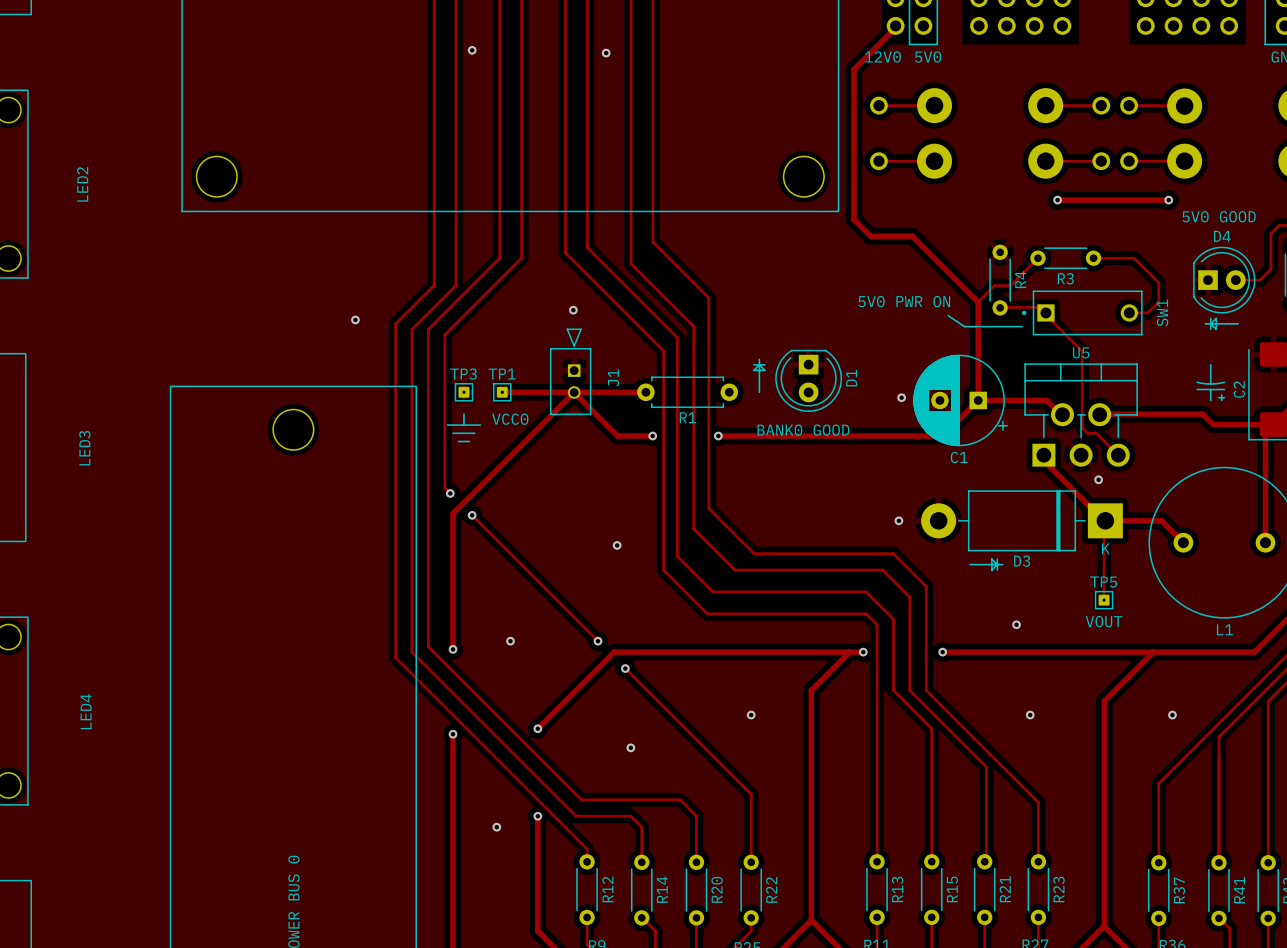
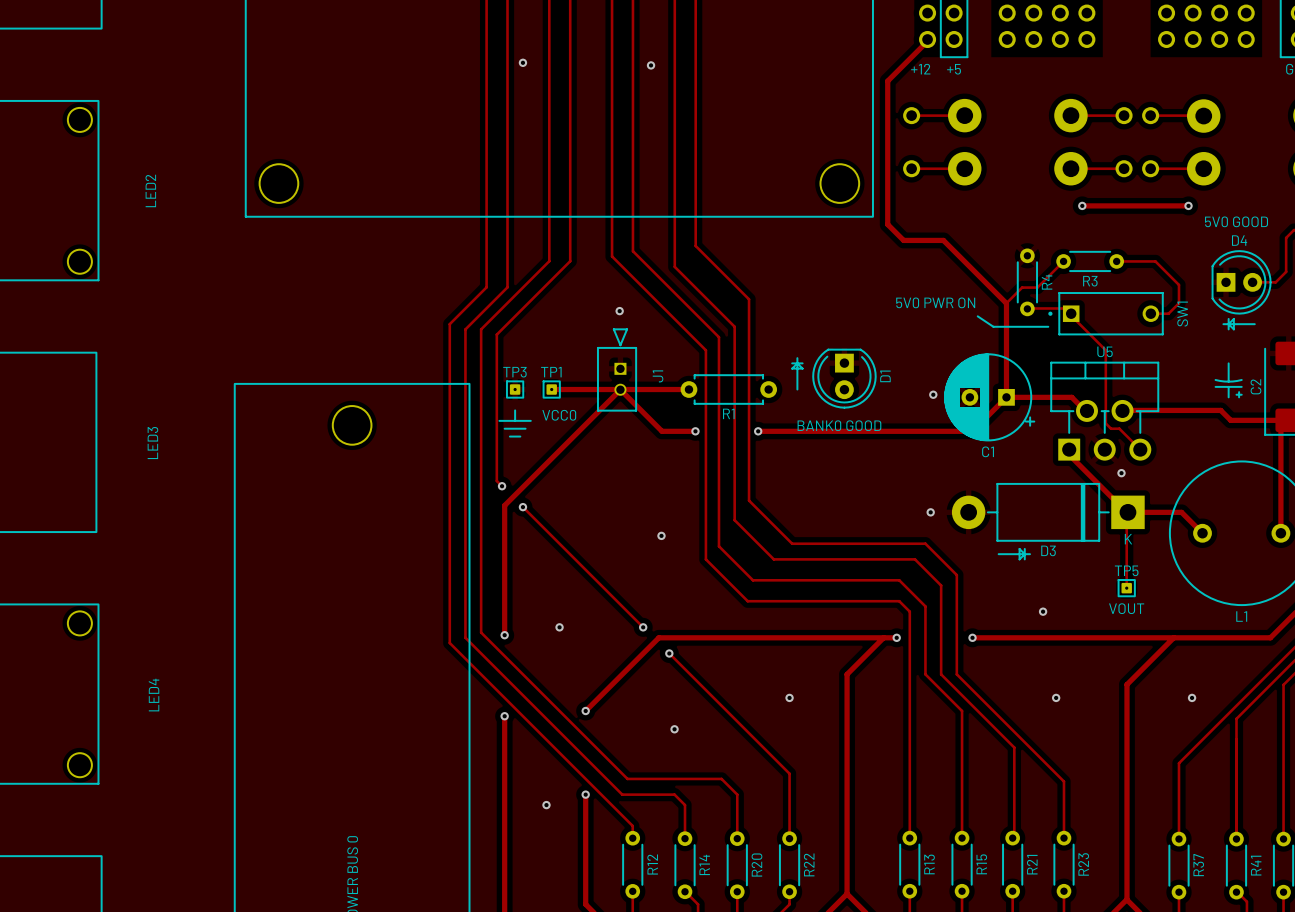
text: 12V0 (882, 57) -> +12 (920, 69)
text: 5V0 (928, 57) -> +5 (954, 69)
via: (355, 319) -> none

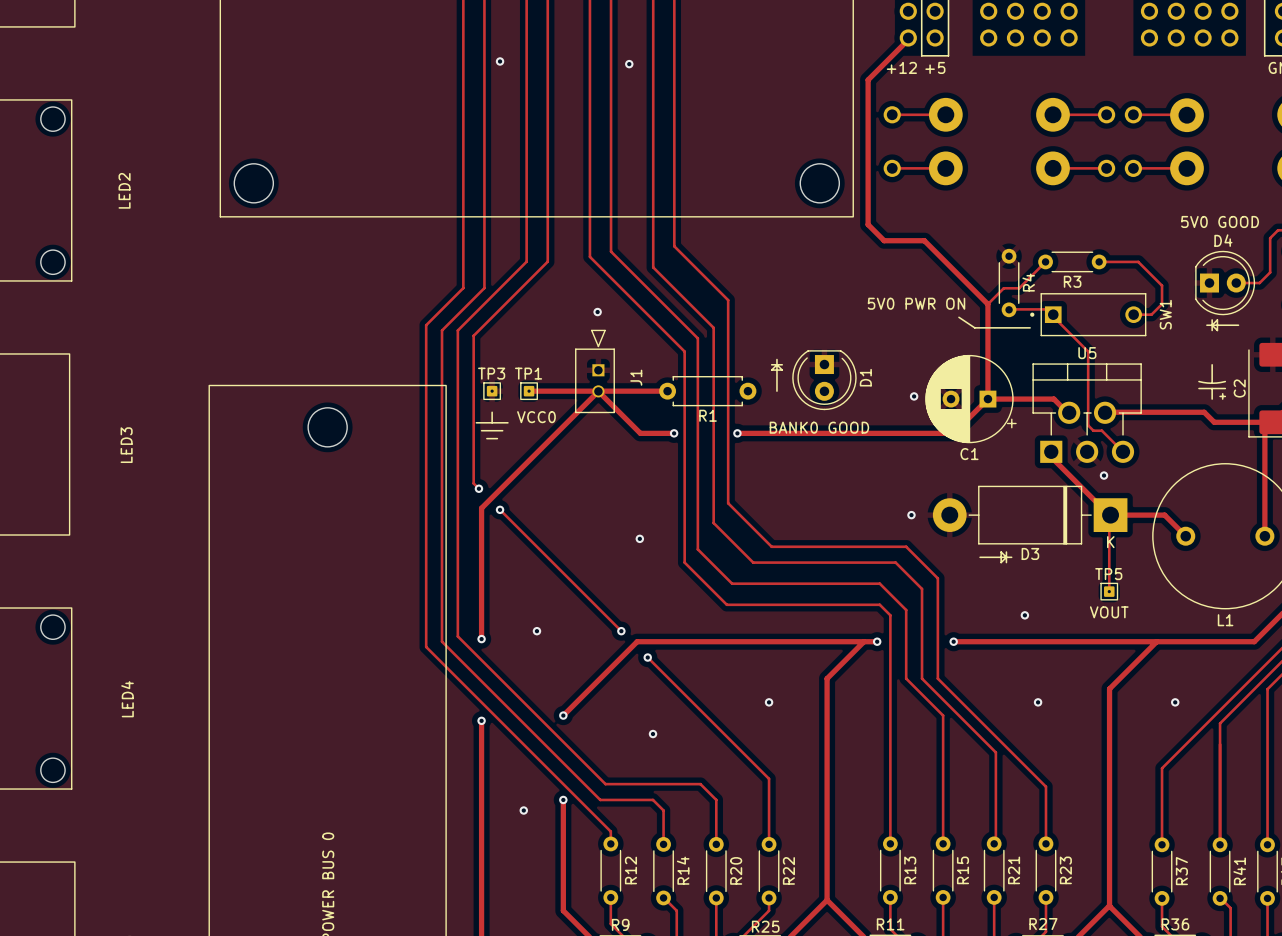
track: (1082, 205) (1188, 205) -> none
via: (1082, 205) -> none
via: (1188, 205) -> none

